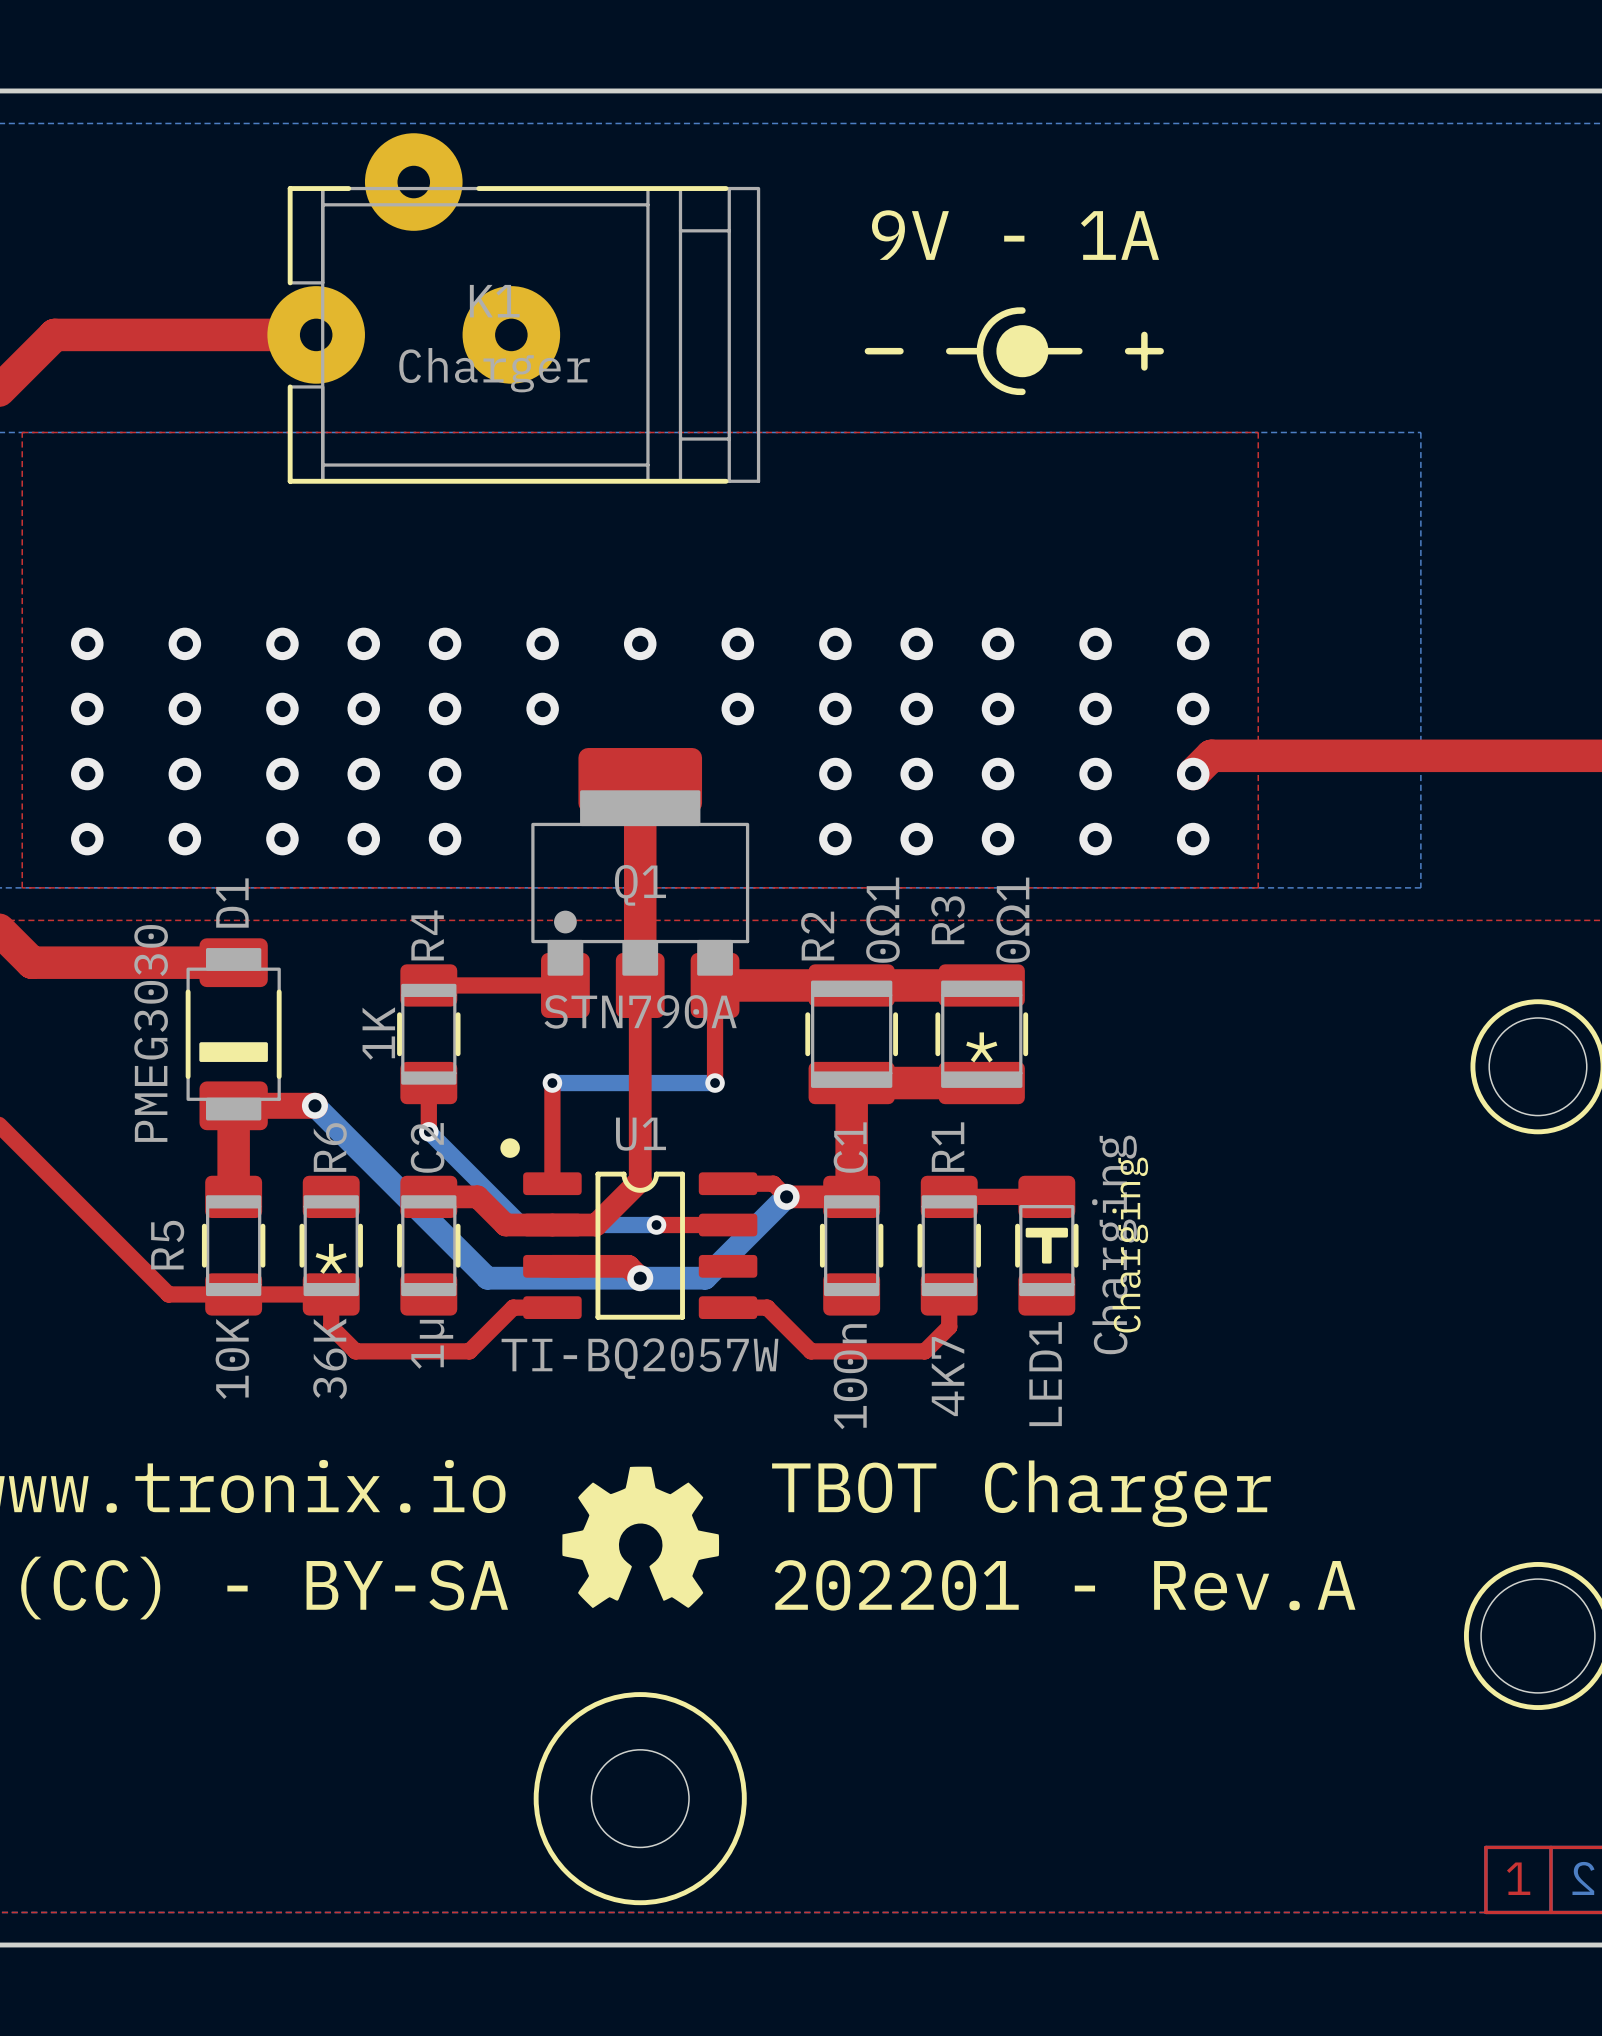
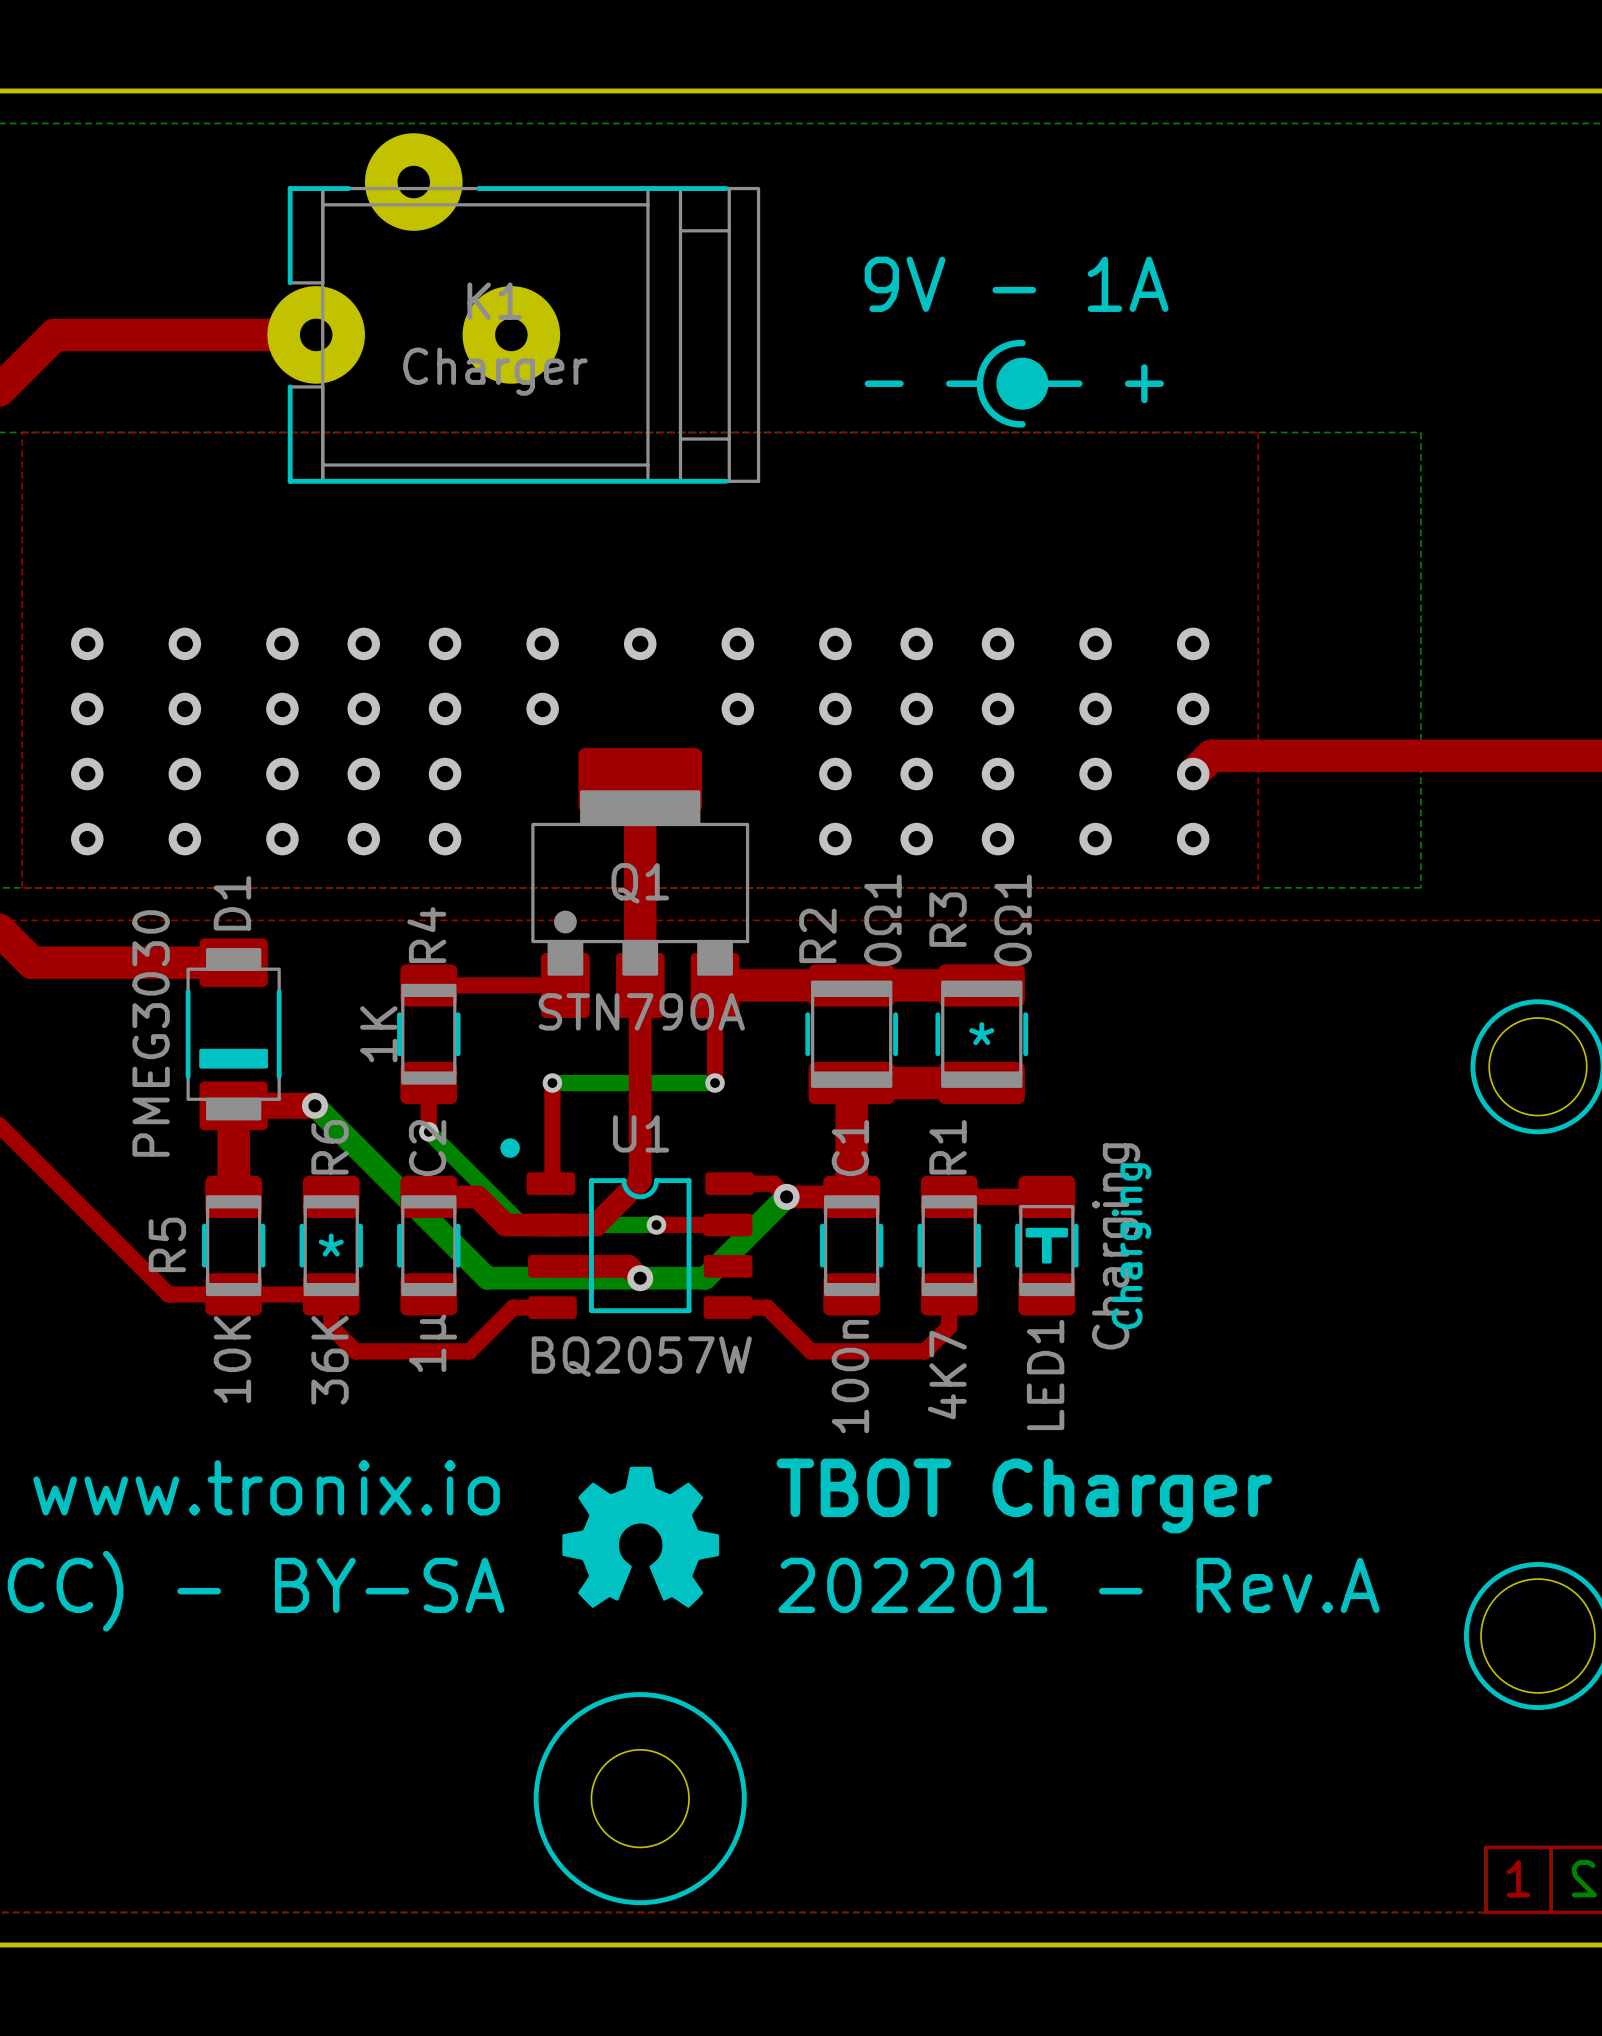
text position: 9V - 1A (1015, 235) -> 9V - 1A (1016, 284)
line: (1022, 310) (1002, 314) (990, 323) (982, 336) (979, 351) (982, 366) (990, 378) (1007, 389) (1022, 391) -> (1022, 343) (1002, 347) (990, 356) (982, 368) (979, 383) (984, 403) (994, 414) (1007, 422) (1022, 424)
line: (1144, 334) (1144, 367) -> (1144, 399) (1144, 367)
line: (867, 351) (900, 351) -> (867, 383) (900, 383)
line: (949, 351) (979, 351) -> (949, 383) (979, 383)
drawing position: (1022, 351) -> (1022, 383)
line: (1046, 351) (1079, 351) -> (1046, 383) (1079, 383)
line: (1128, 351) (1160, 351) -> (1128, 383) (1160, 383)
Q1 footprint: [531, 748, 750, 1018] -> [531, 748, 750, 1018]
D1 footprint: [185, 938, 282, 1131] -> [185, 938, 282, 1131]
U1 footprint: [523, 1171, 758, 1320] -> [526, 1172, 755, 1320]
U1 value: TI-BQ2057W (640, 1358) -> BQ2057W (641, 1356)

